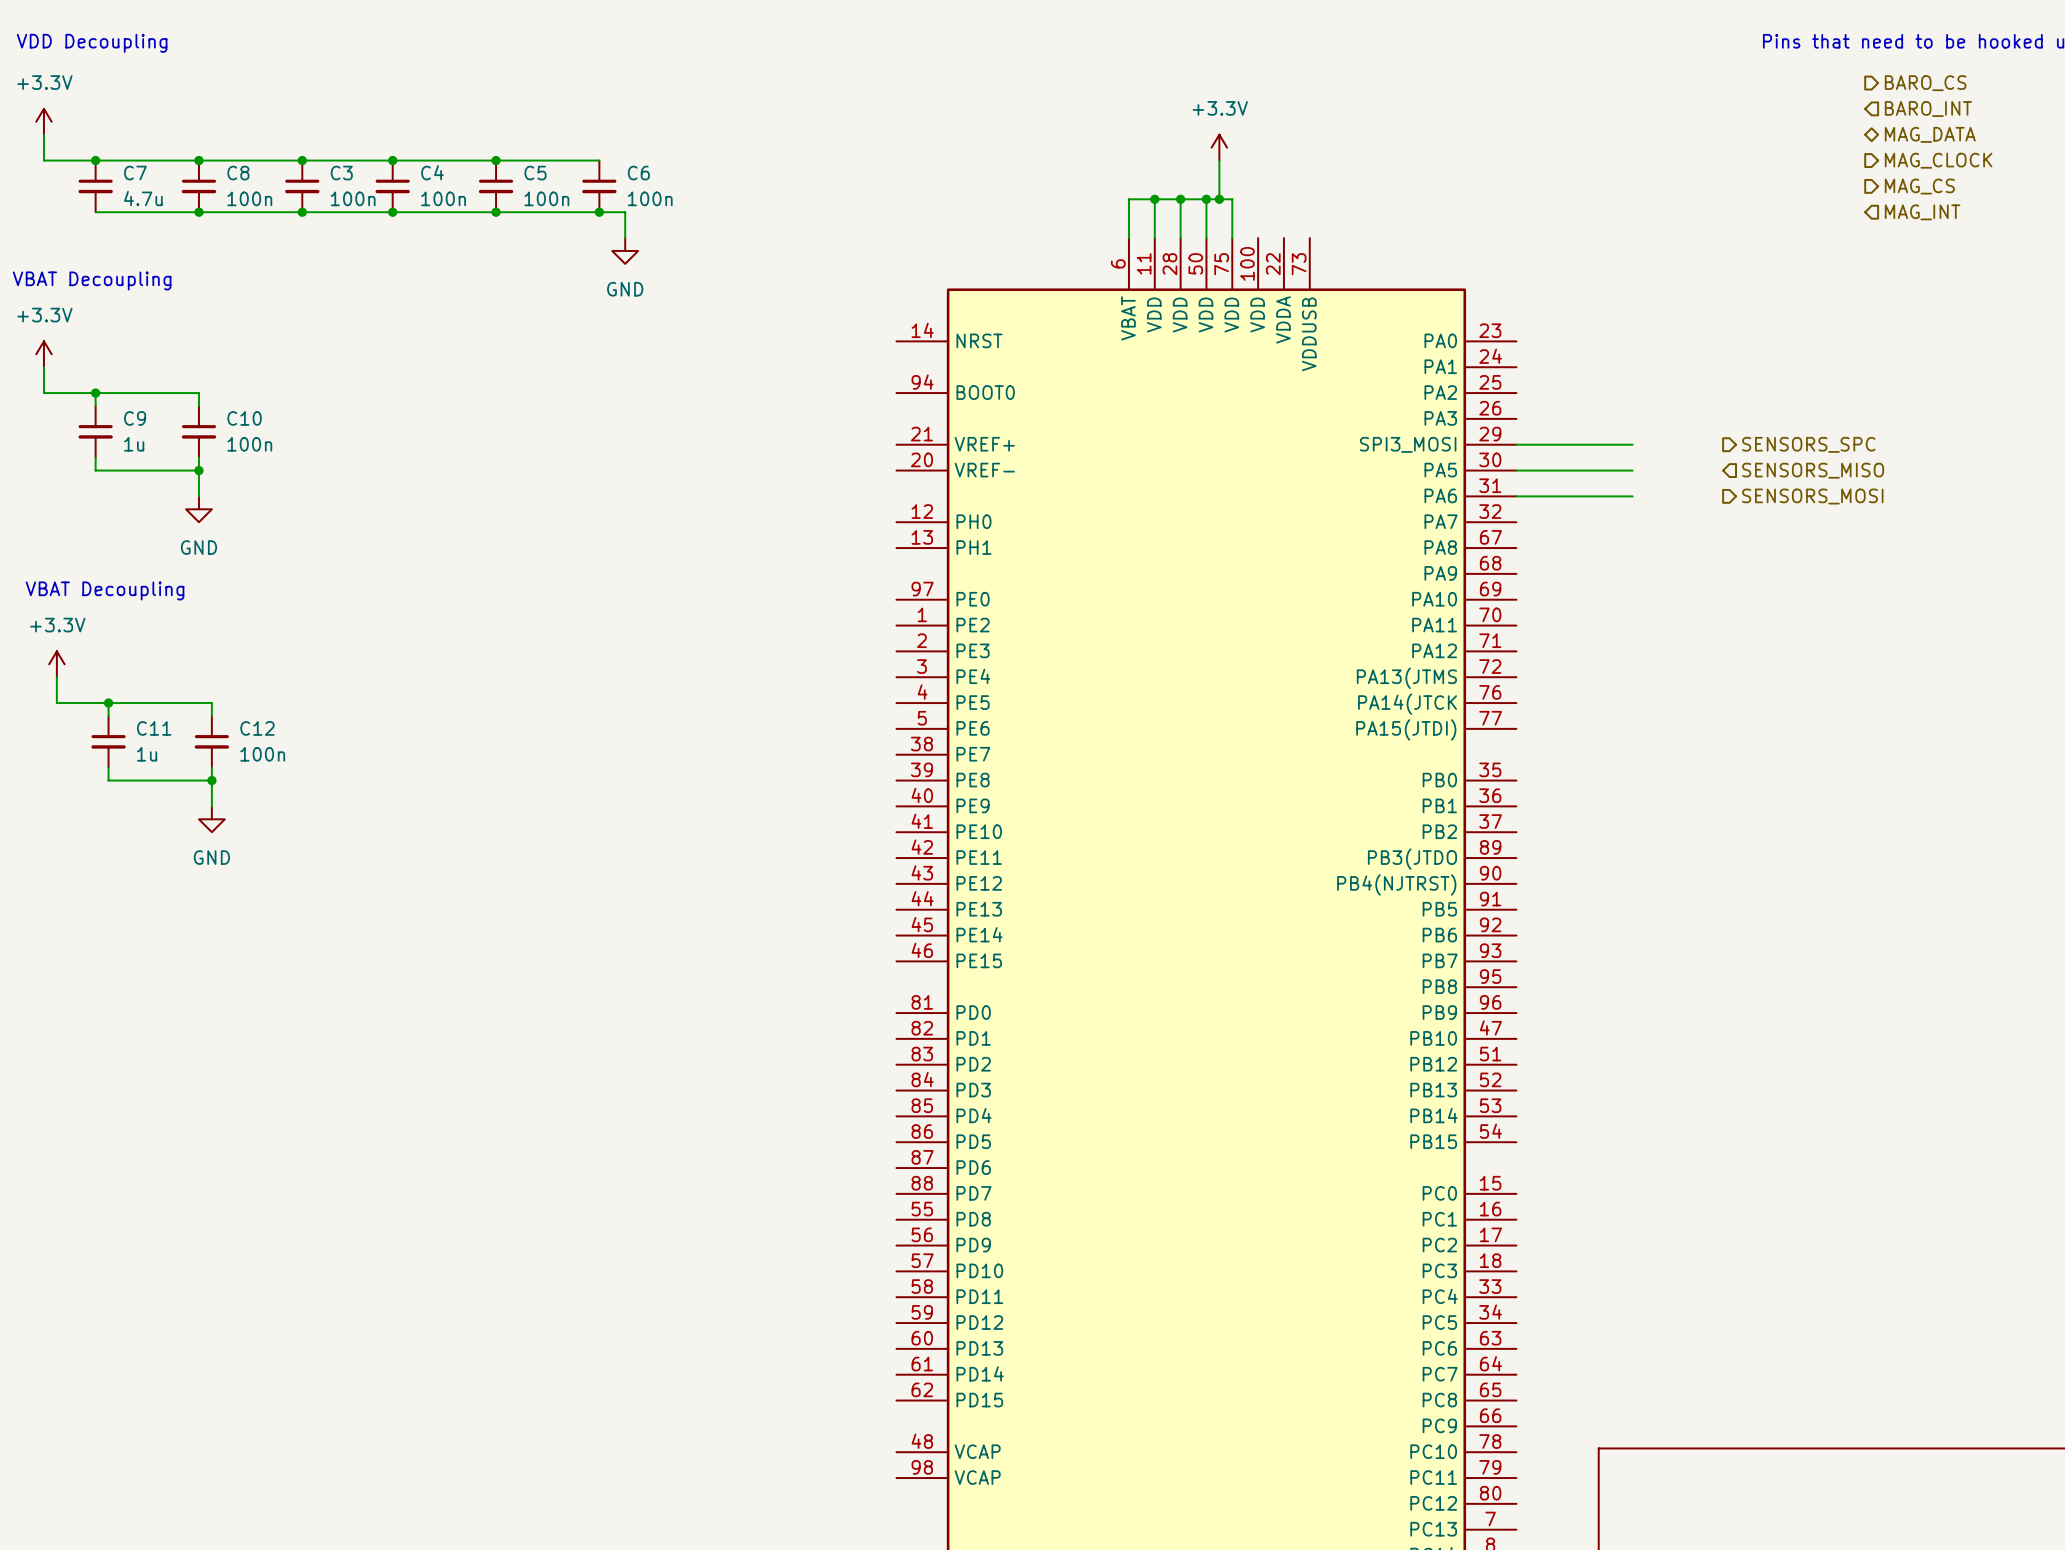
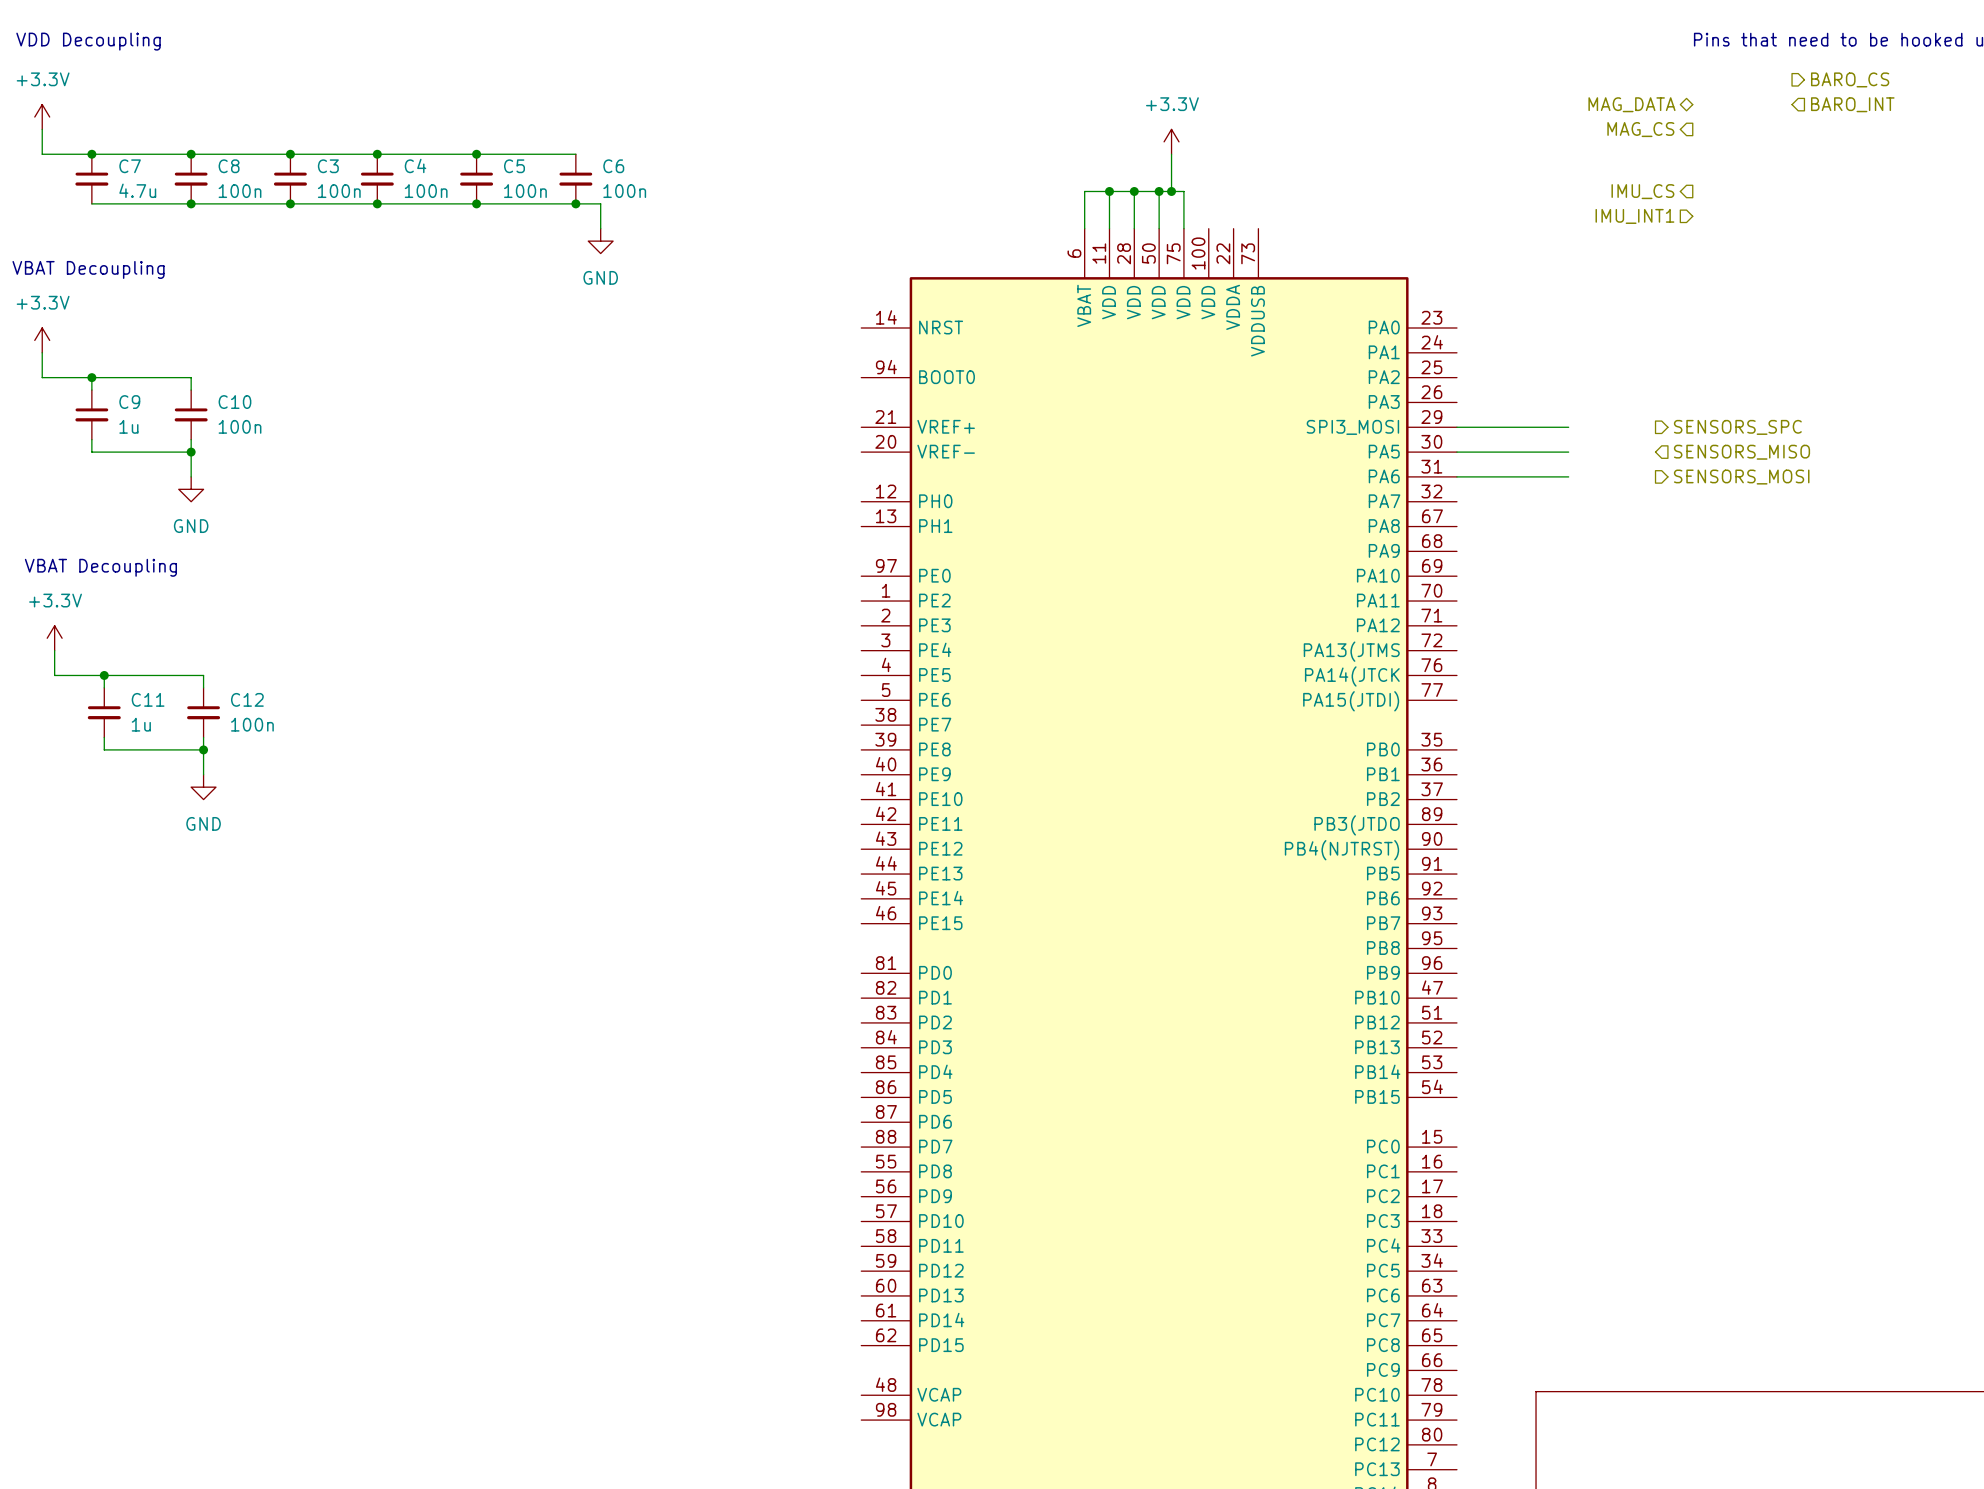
hierarchical label rotation: 0° (1930, 134) -> 180° (1631, 104)
hierarchical label position: MAG_DATA (1930, 134) -> MAG_DATA (1631, 104)
hierarchical label: MAG_CLOCK (1938, 160) -> none
hierarchical label rotation: 0° (1919, 186) -> 180° (1640, 129)
hierarchical label position: MAG_CS (1919, 186) -> MAG_CS (1640, 129)
hierarchical label: none -> IMU_CS (1642, 191)
hierarchical label: MAG_INT (1922, 212) -> none
hierarchical label: none -> IMU_INT1 (1634, 216)

